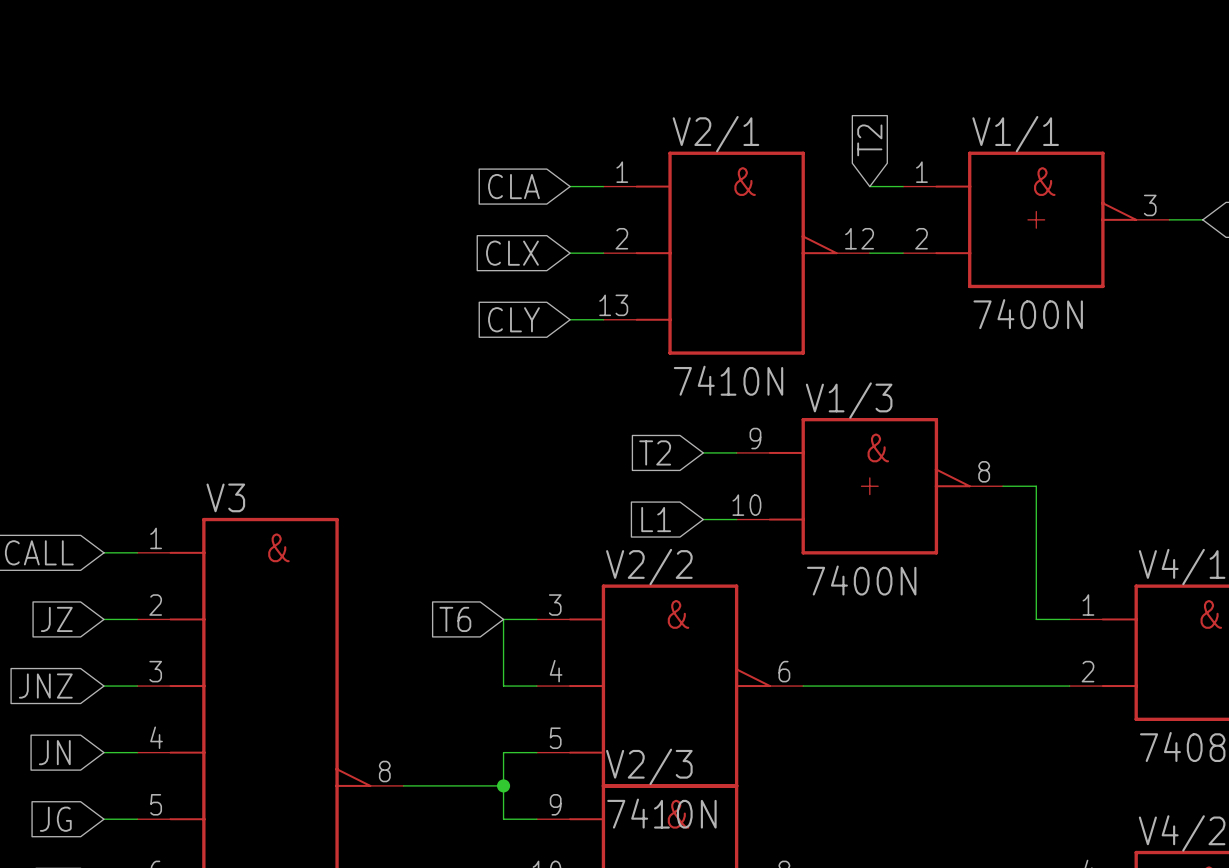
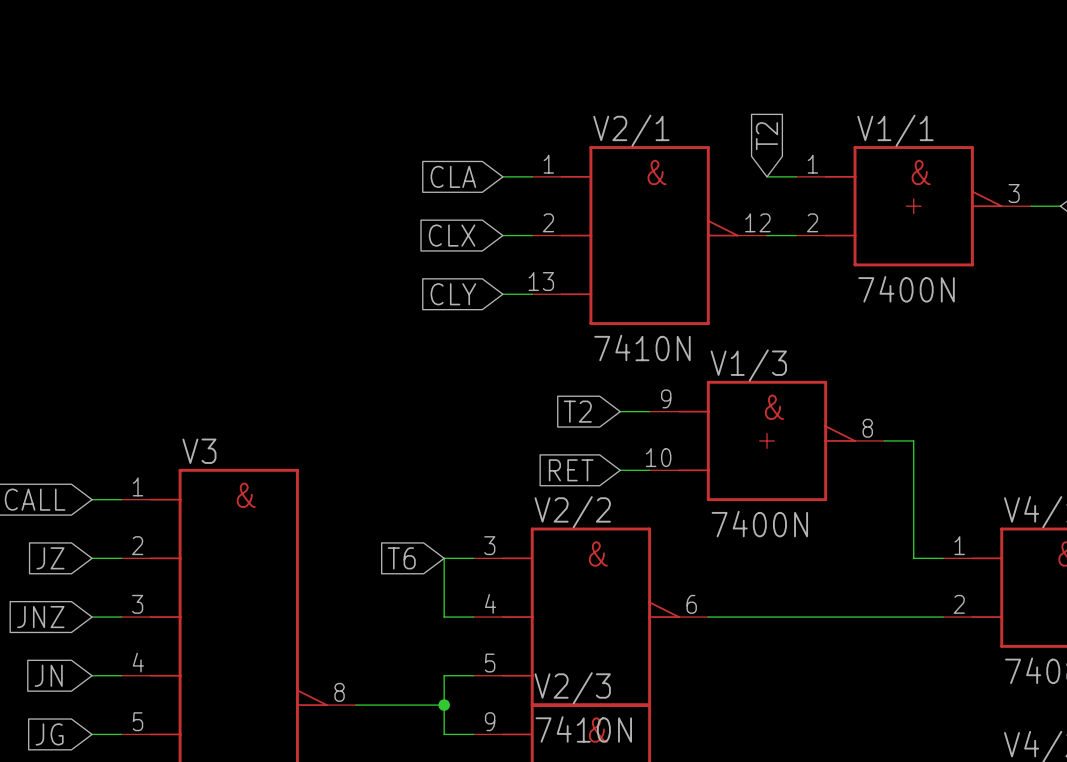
global label: L1 (656, 519) -> RET (571, 470)

